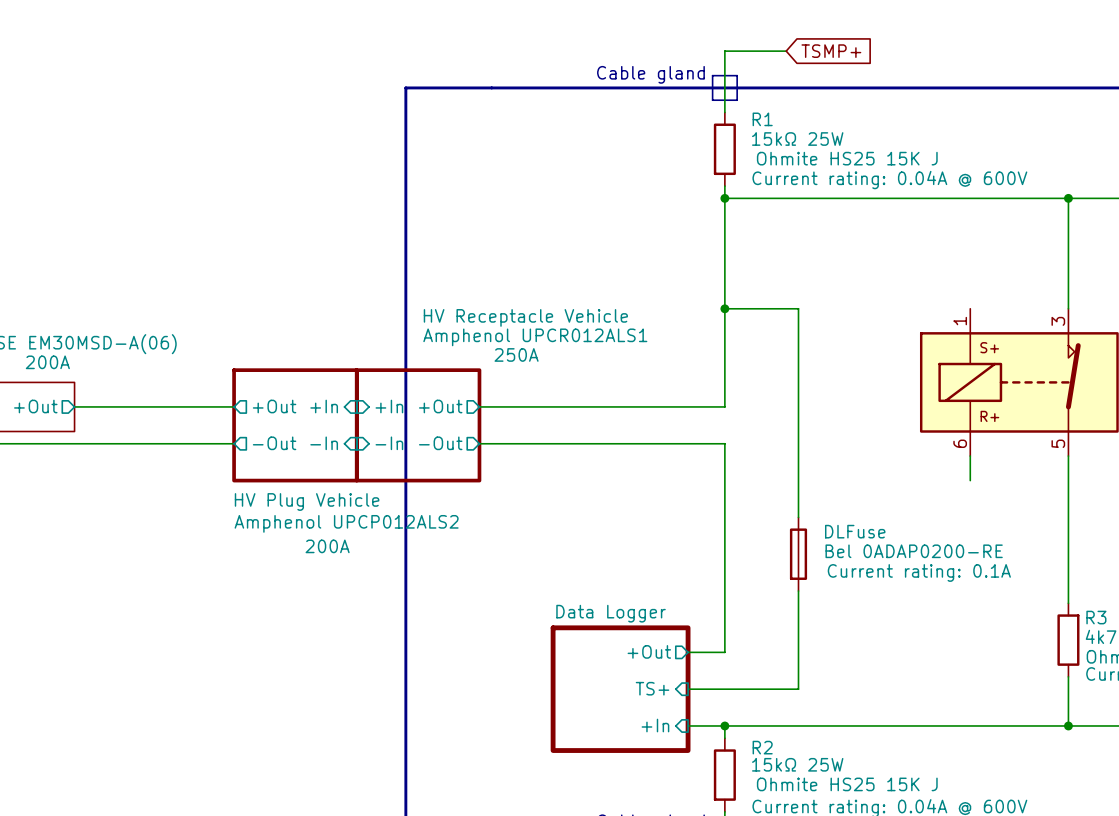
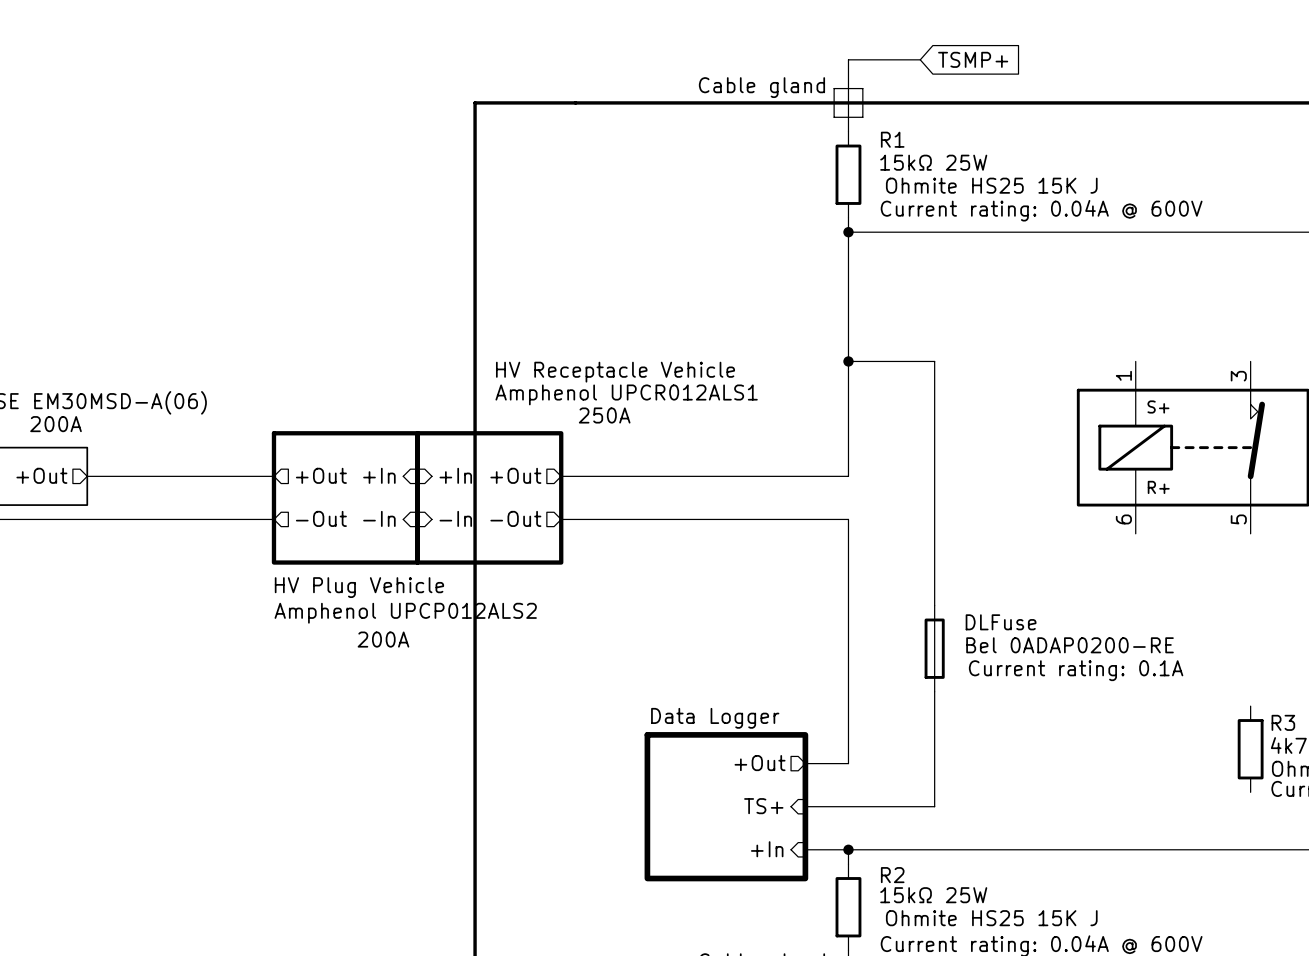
wire: (1068, 198) (1068, 308) -> none
junction: (1068, 198) -> none
wire: (970, 456) (970, 480) -> none
wire: (1068, 456) (1068, 603) -> none
wire: (1068, 676) (1068, 725) -> none
junction: (1068, 725) -> none

